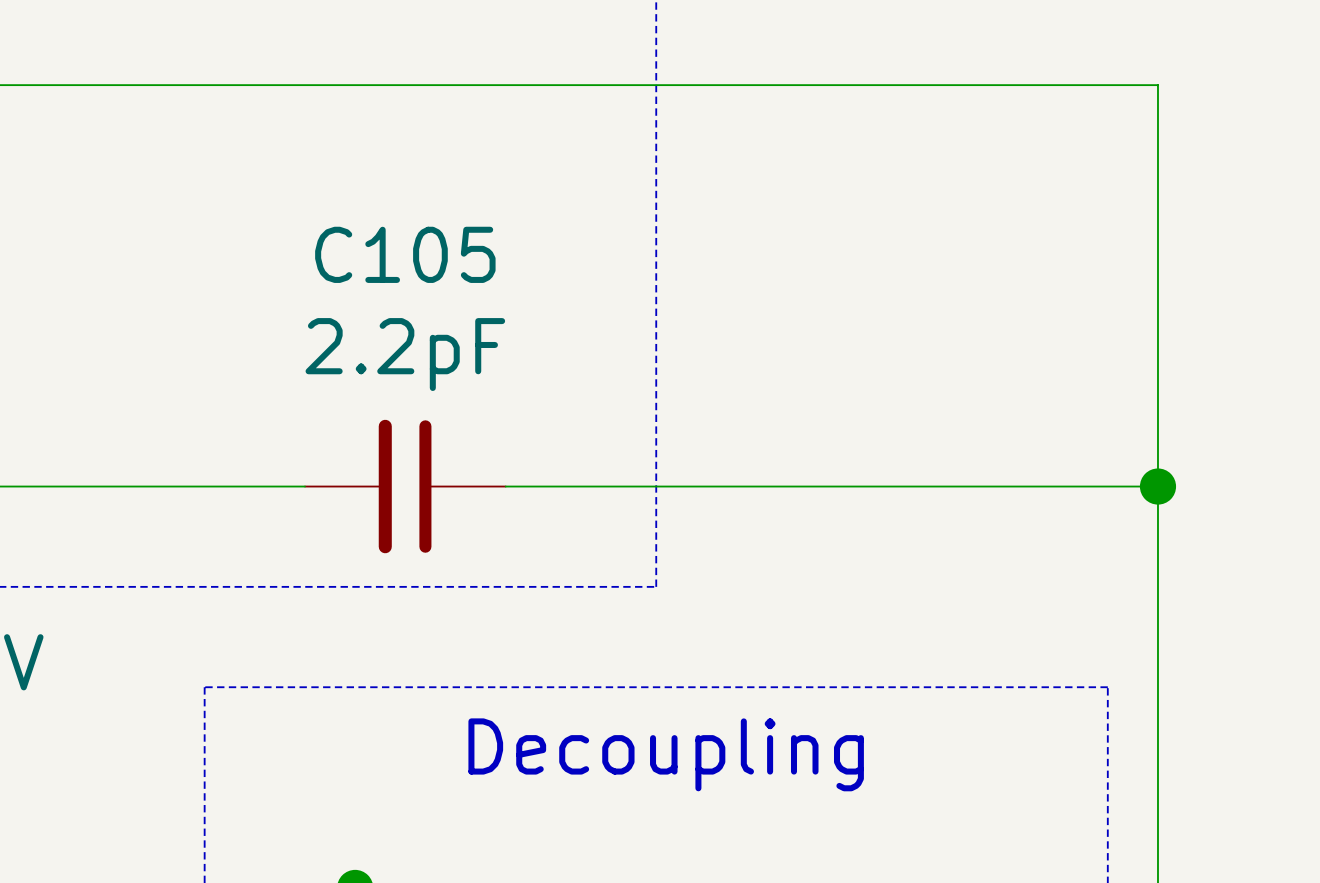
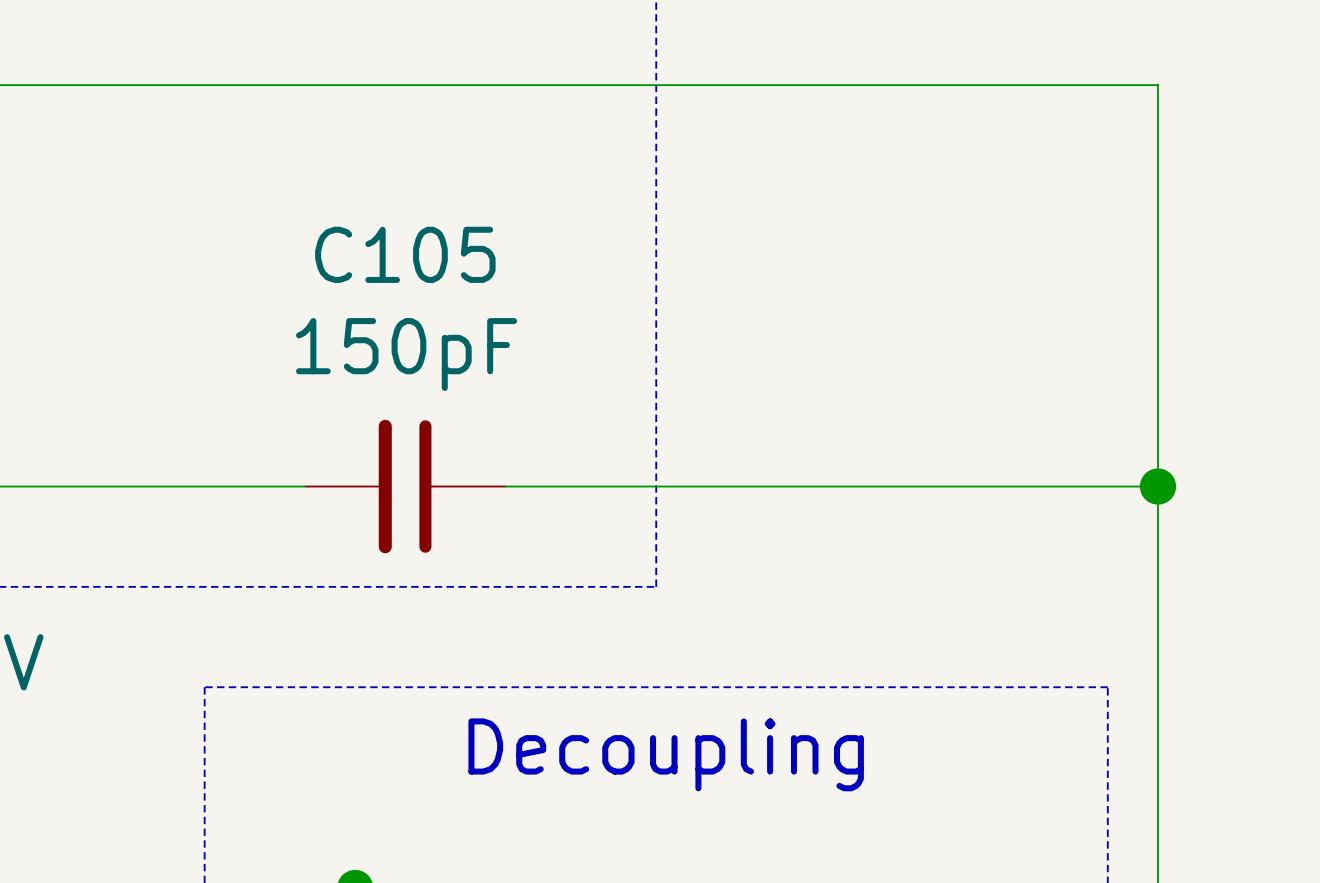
C105 value: 2.2pF (405, 354) -> 150pF (406, 354)

